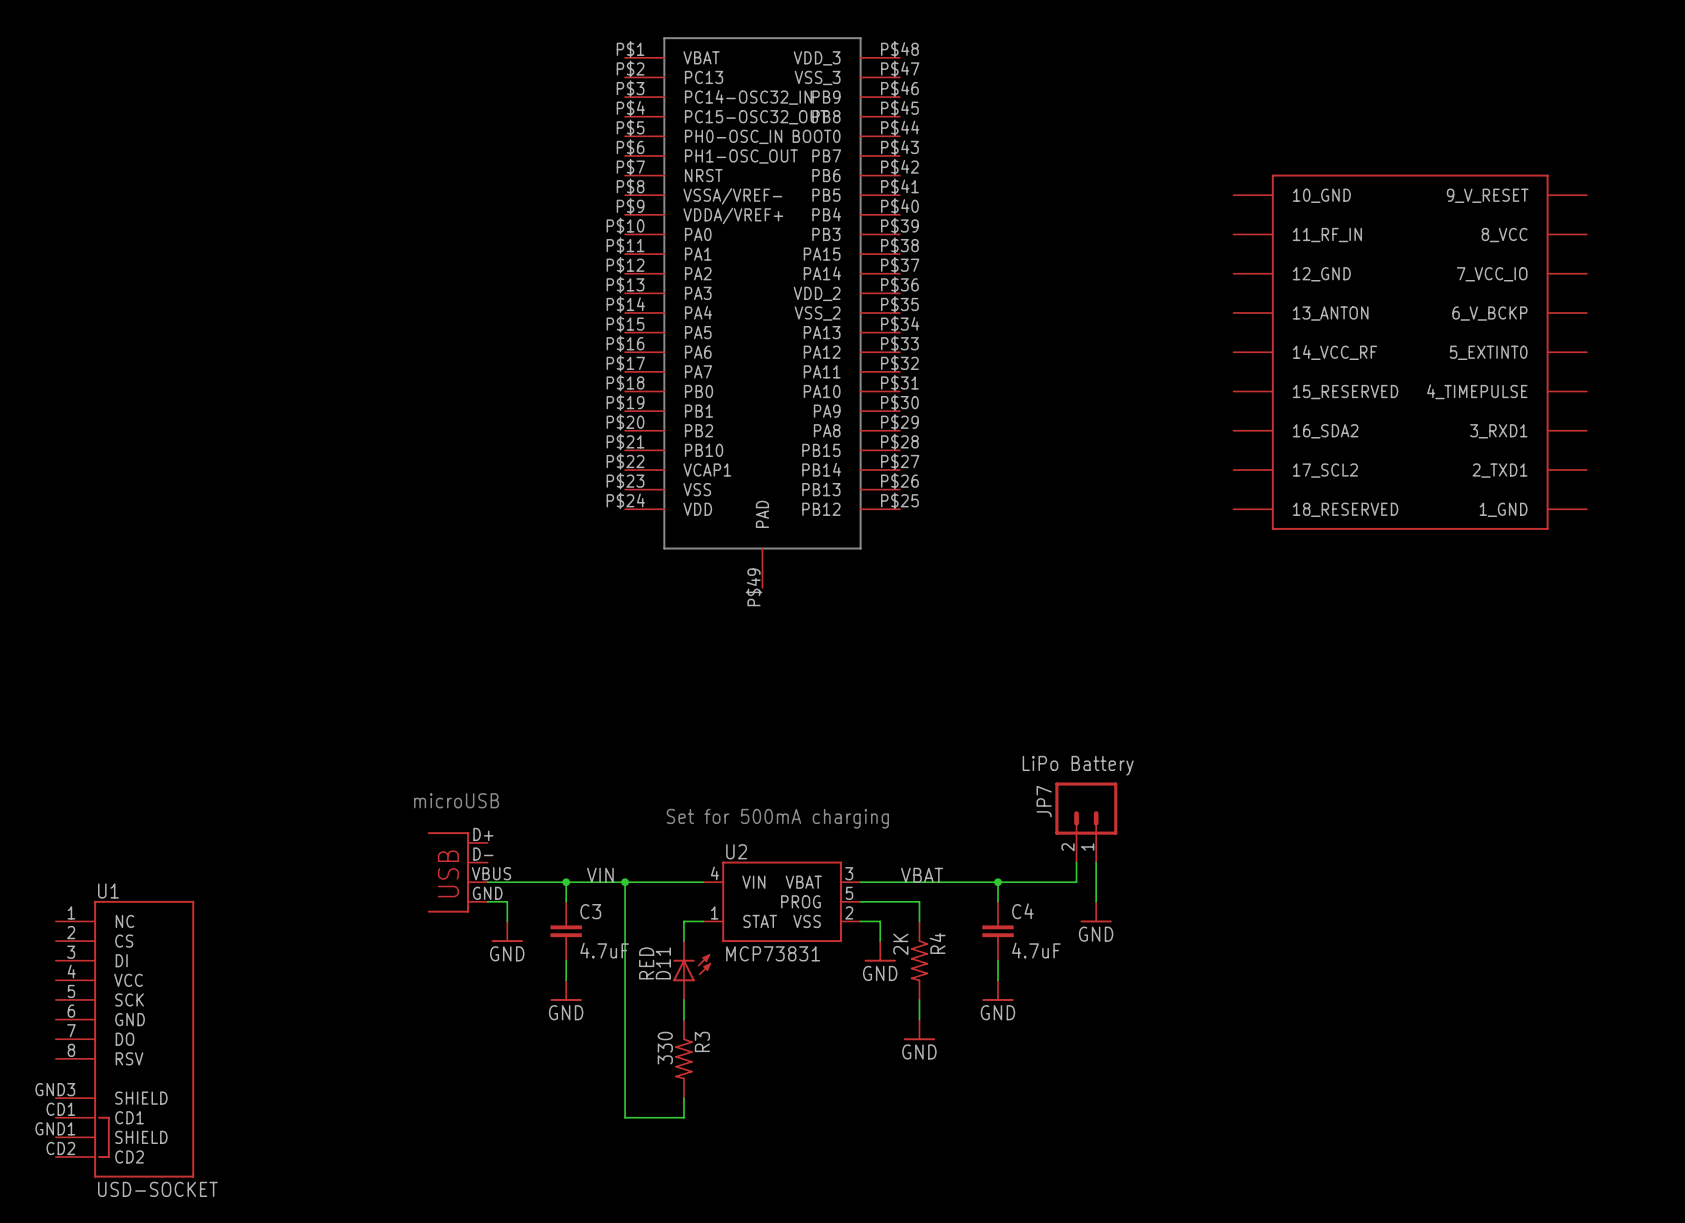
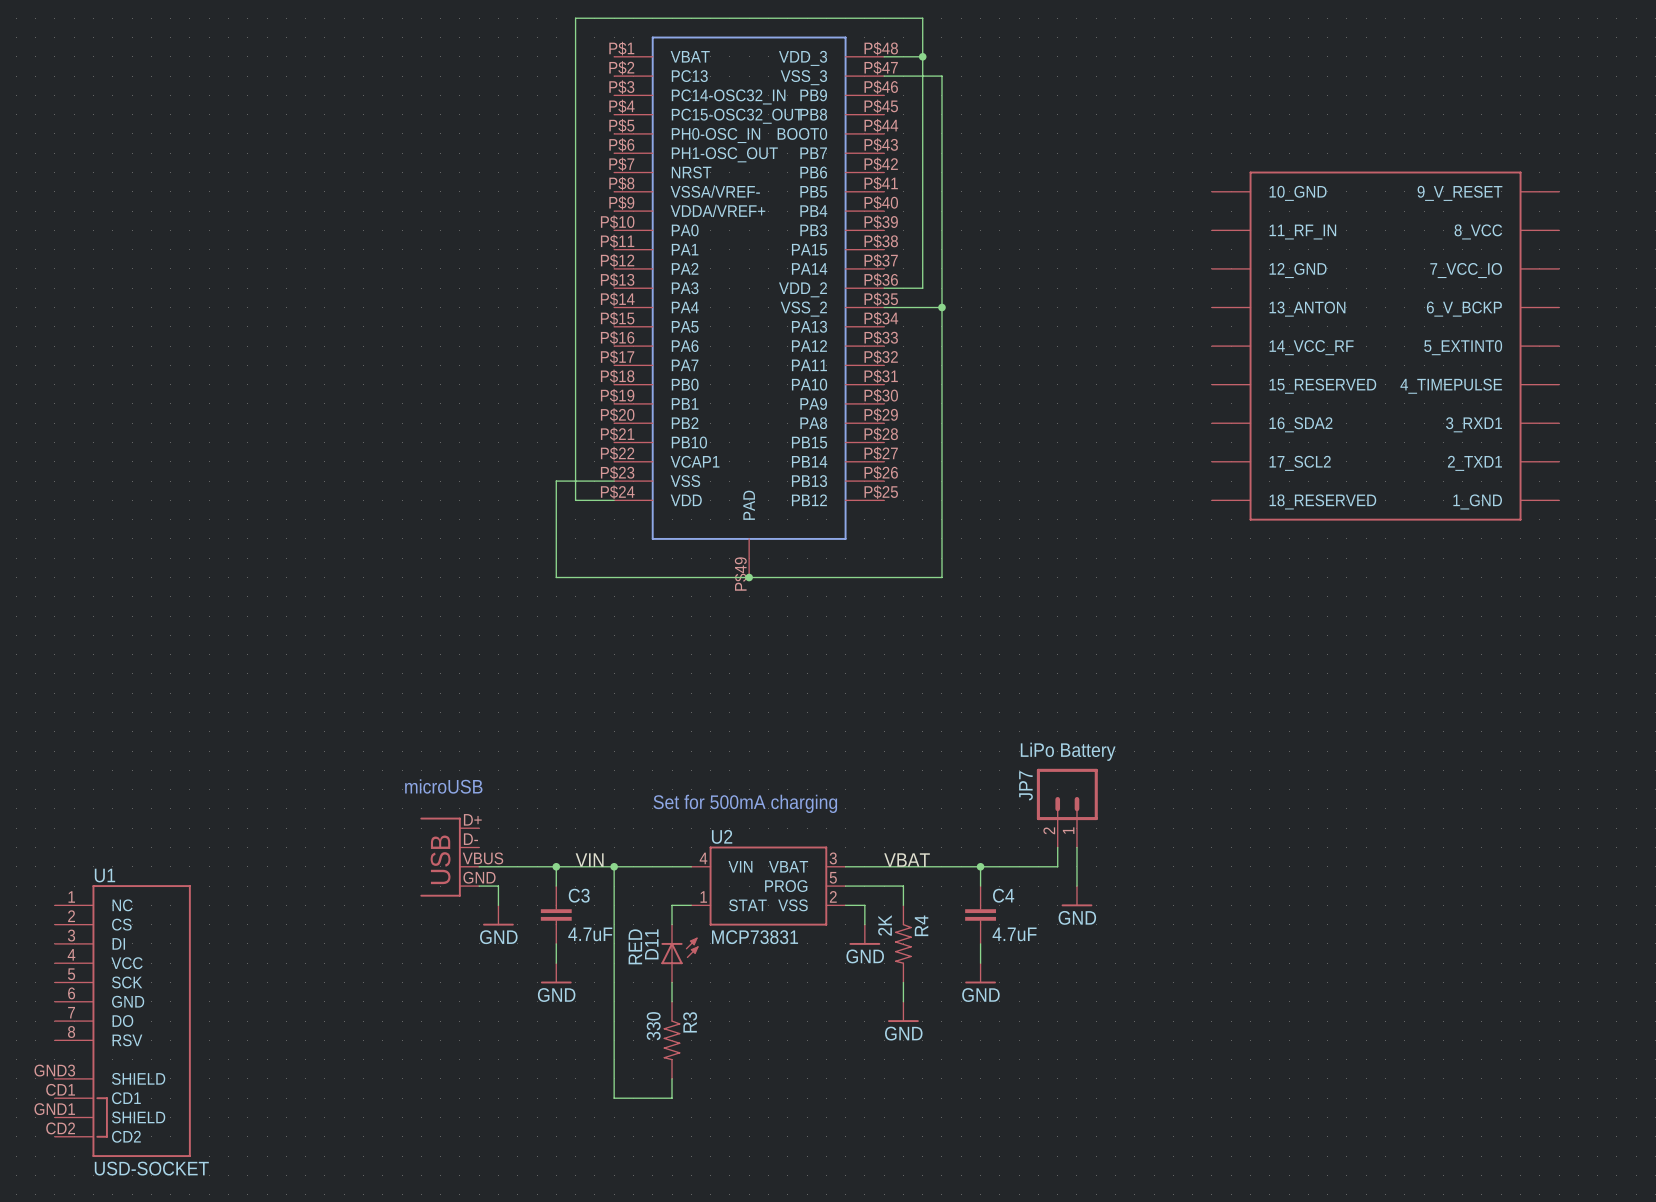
wire: none -> (884, 56) (922, 56)
junction: none -> (922, 56)
wire: none -> (884, 76) (941, 76) (941, 577) (556, 577) (556, 481) (614, 481)
wire: none -> (884, 288) (922, 288) (922, 18) (575, 18) (575, 500) (614, 500)
wire: none -> (884, 307) (941, 307)
junction: none -> (941, 307)
junction: none -> (749, 577)

